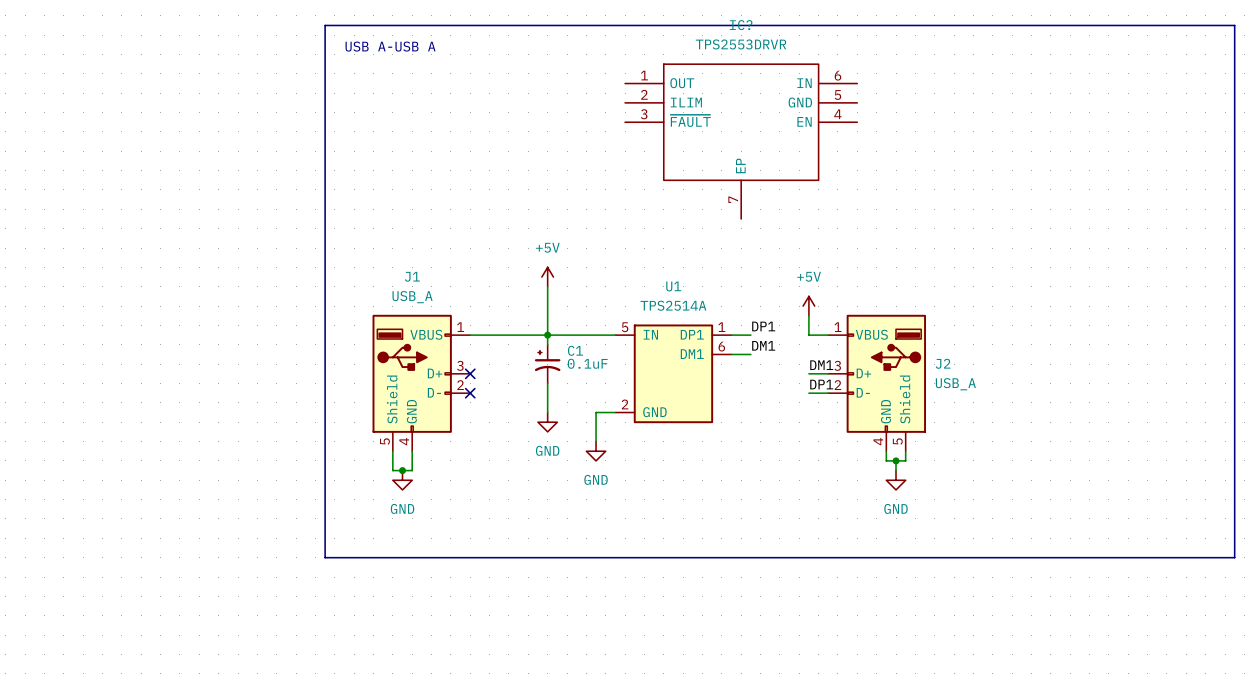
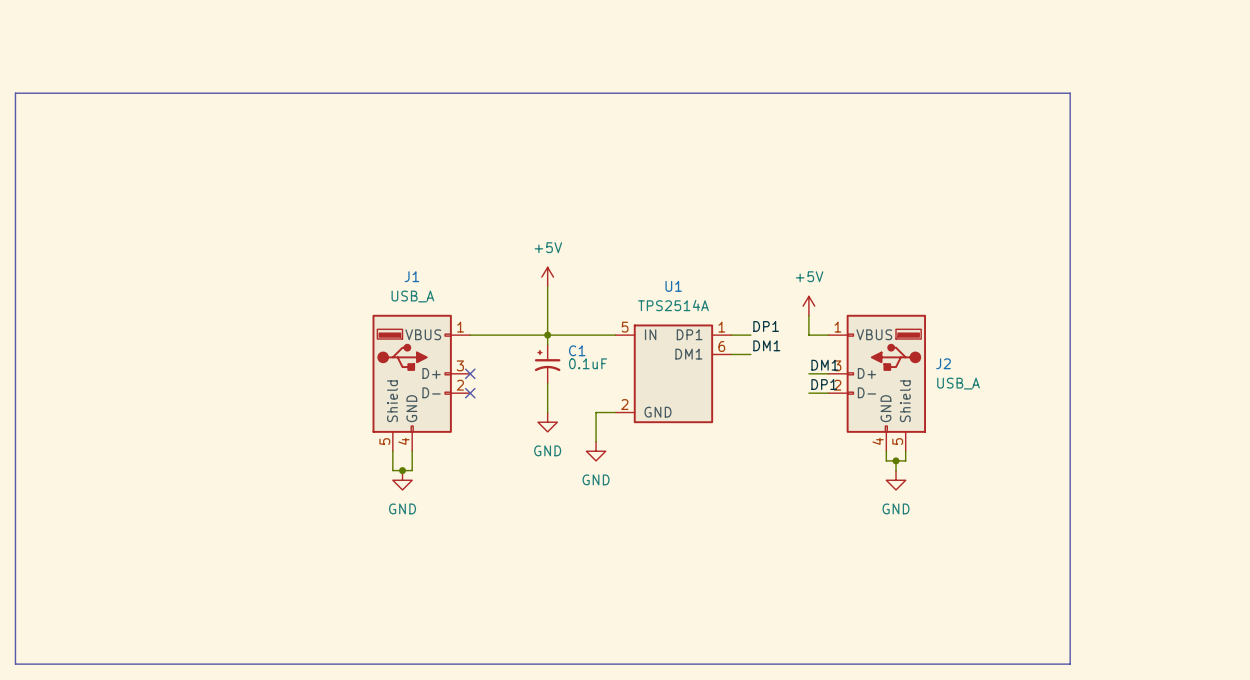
line: (325, 25) (325, 557) (1234, 557) (1234, 25) (325, 25) -> none
text: USB A-USB A (390, 46) -> none
line: none -> (15, 93) (15, 664) (1070, 664) (1070, 93) (15, 93)
IC?: TPS2553DRVR (741, 141) -> none

